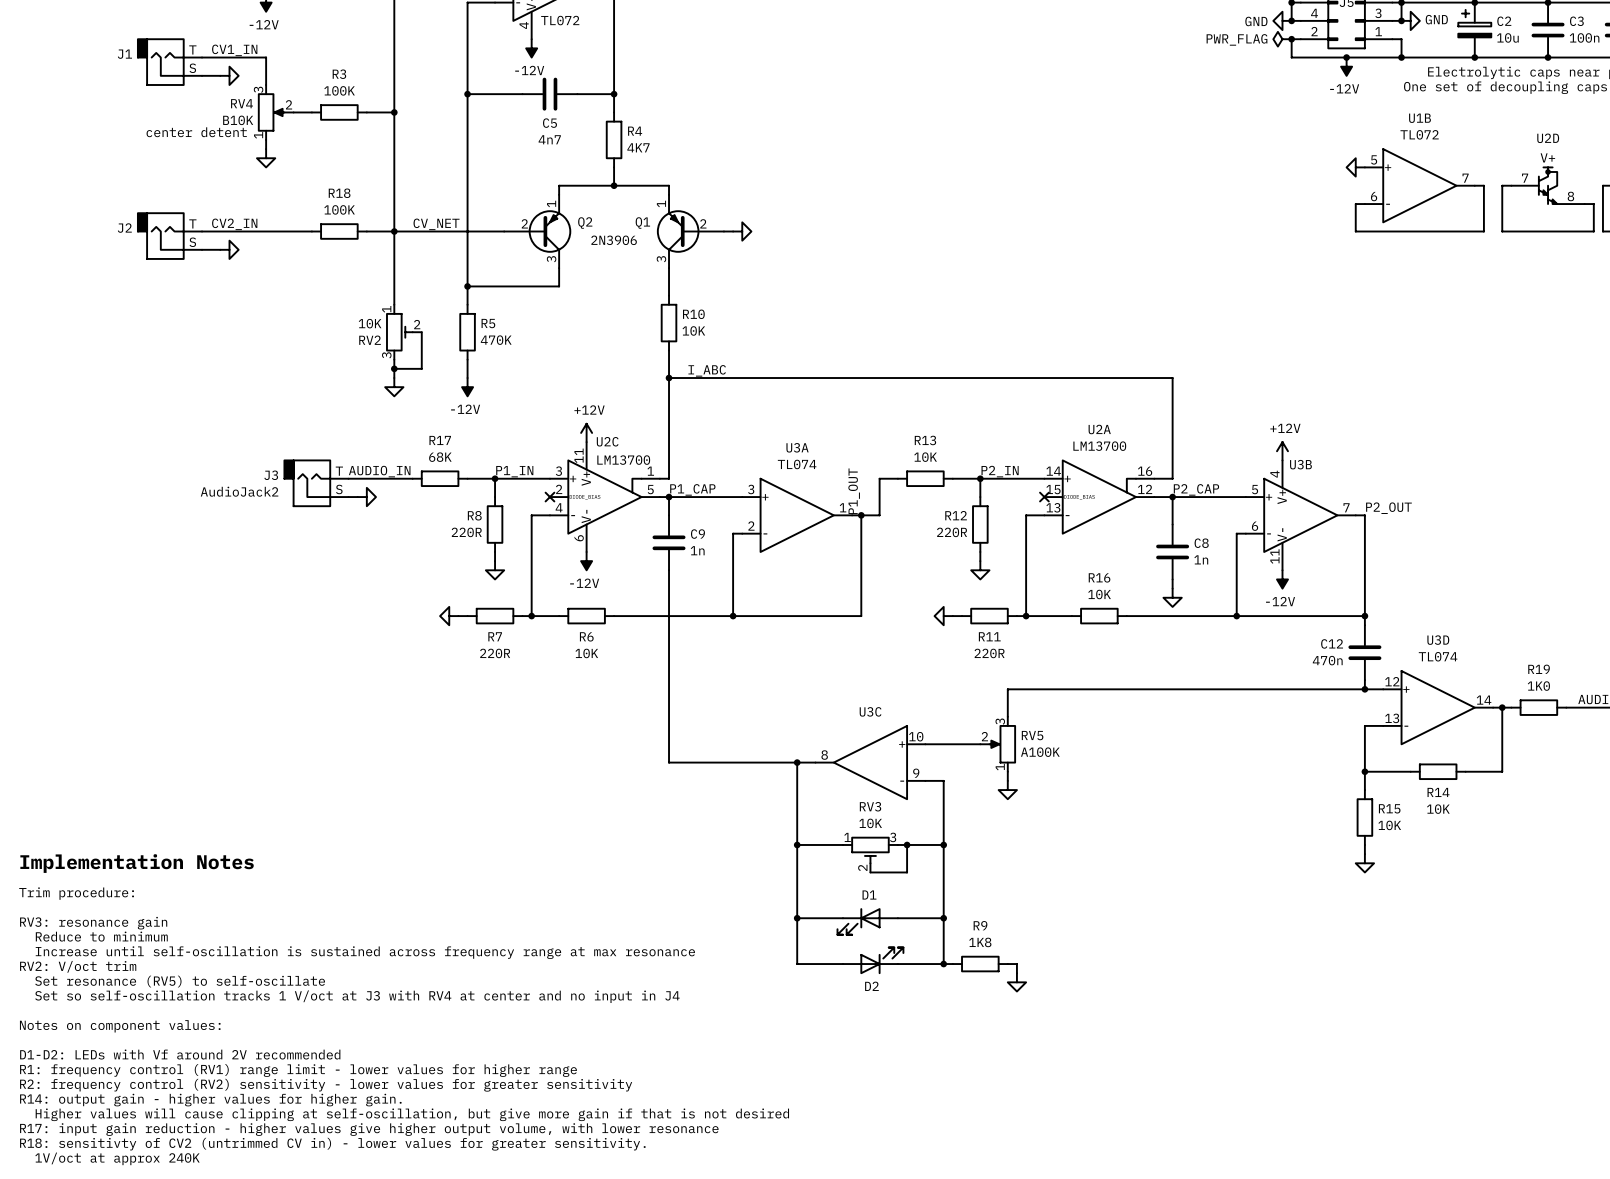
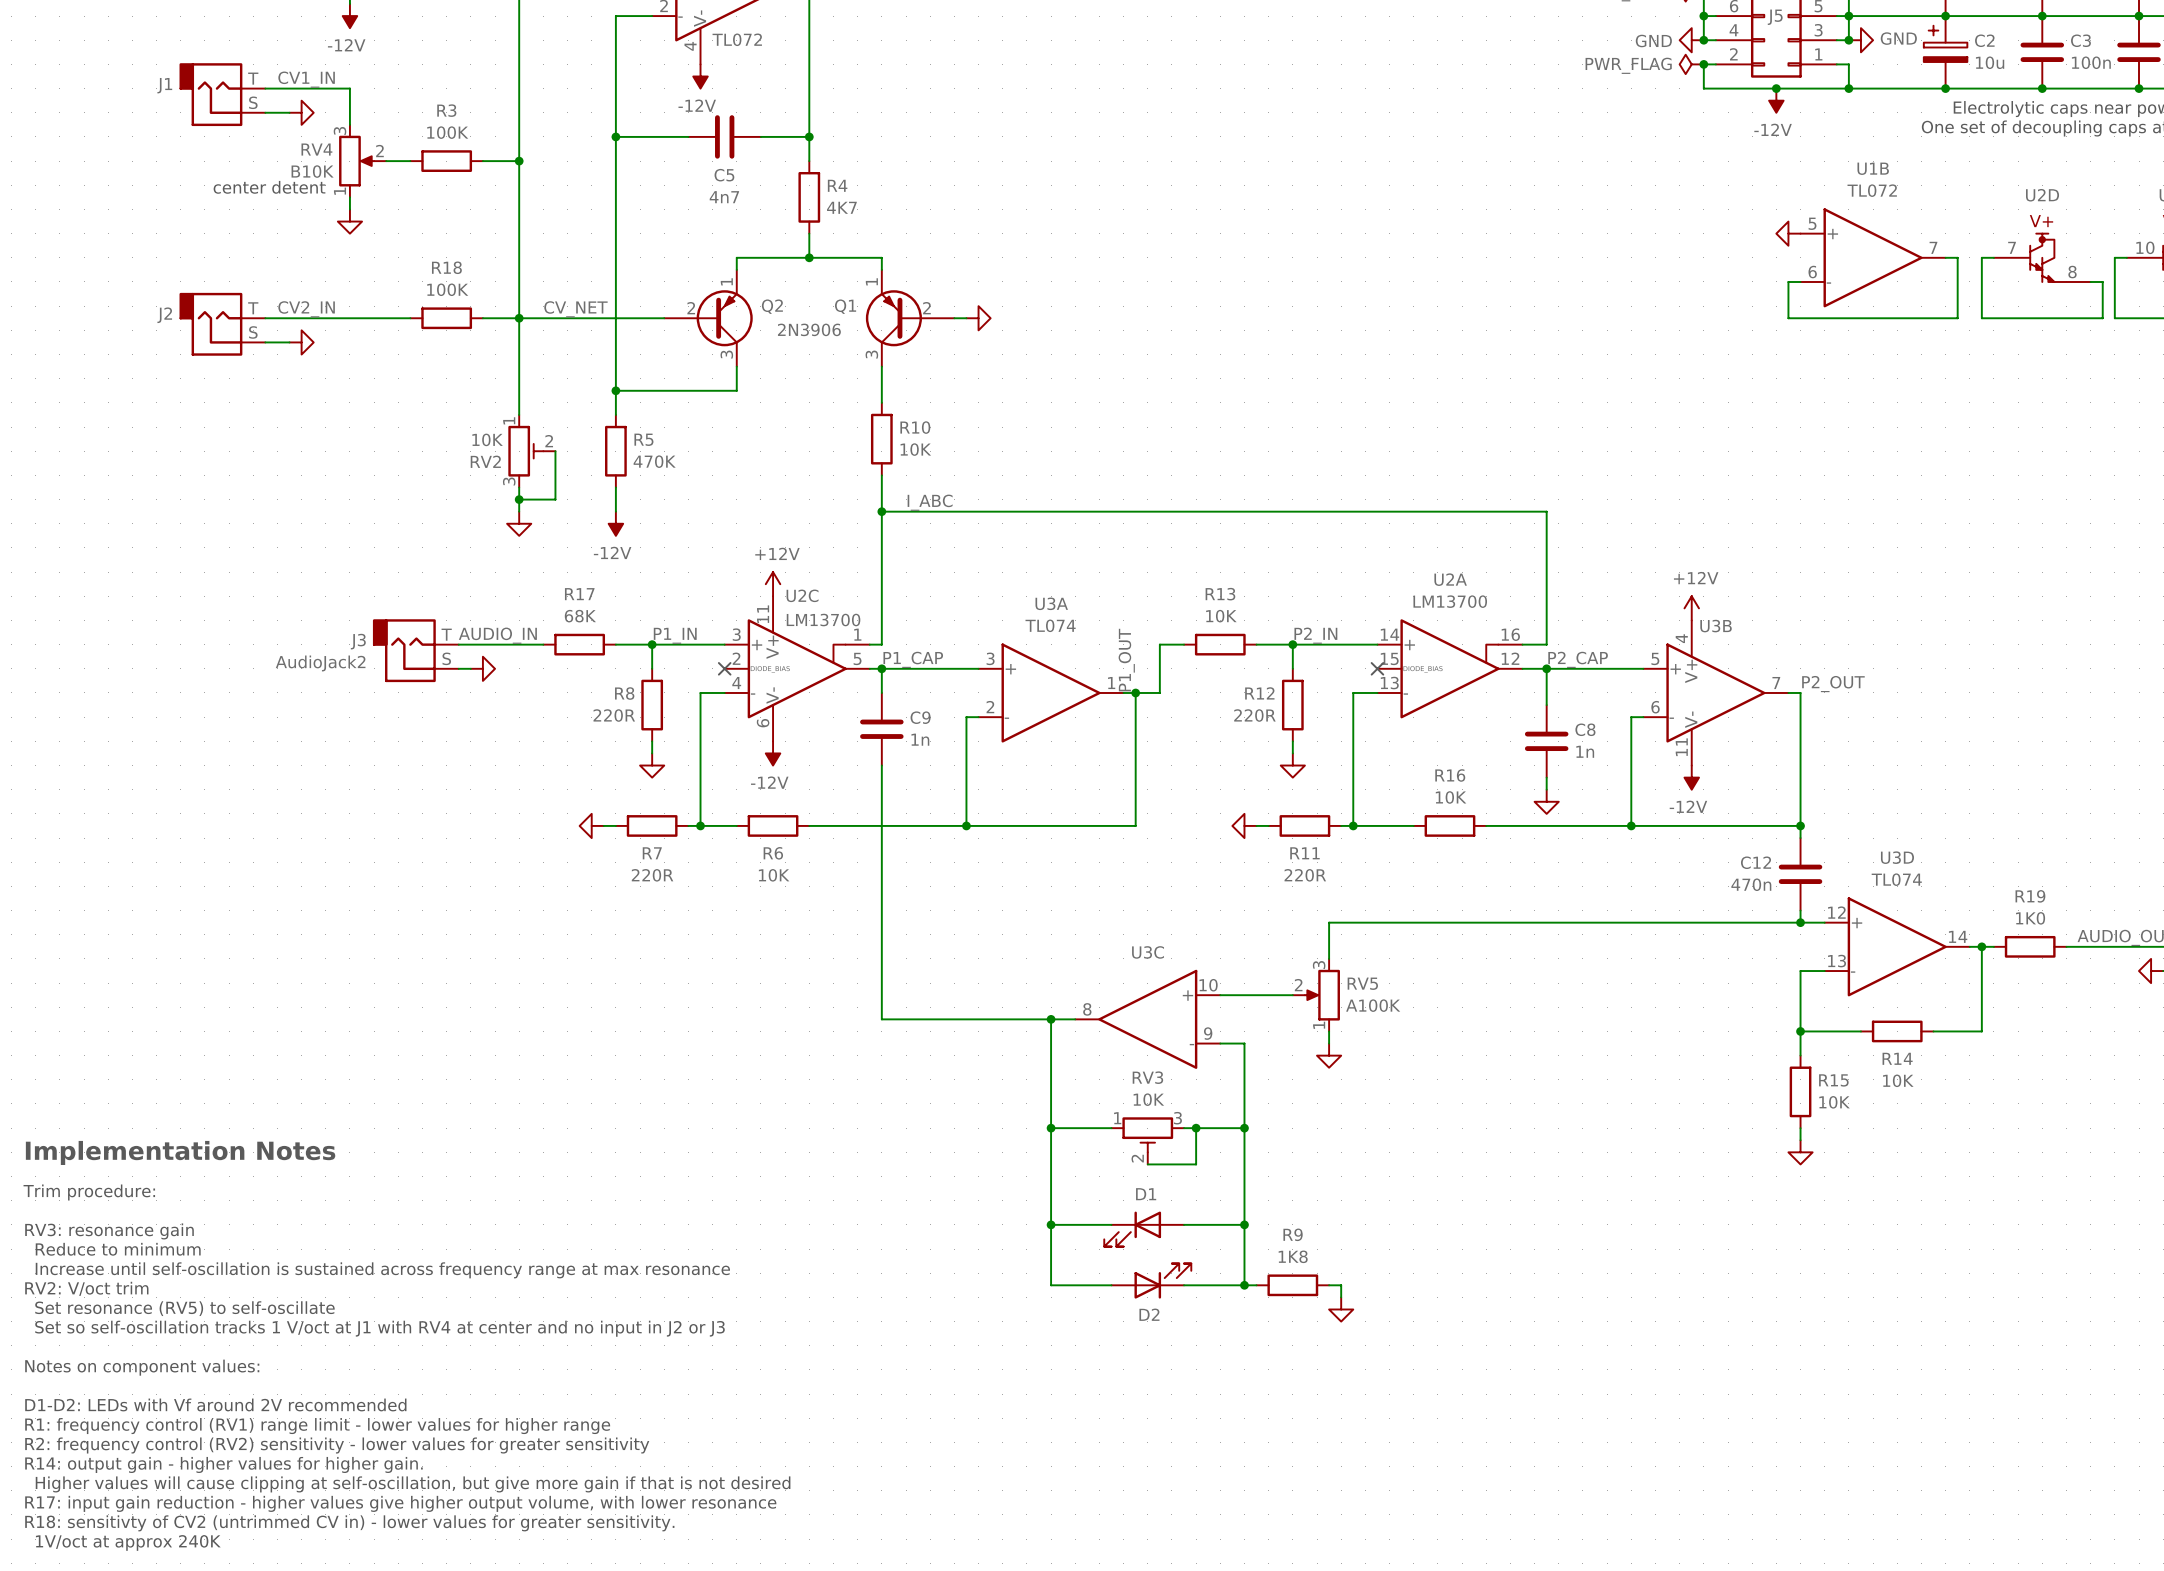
text: Set so self-oscillation tracks 1 V/oct at J3 with RV4 at center and no input in J4 (357, 996) -> Set so self-oscillation tracks 1 V/oct at J1 with RV4 at center and no input in J2 or J3 (380, 1328)

